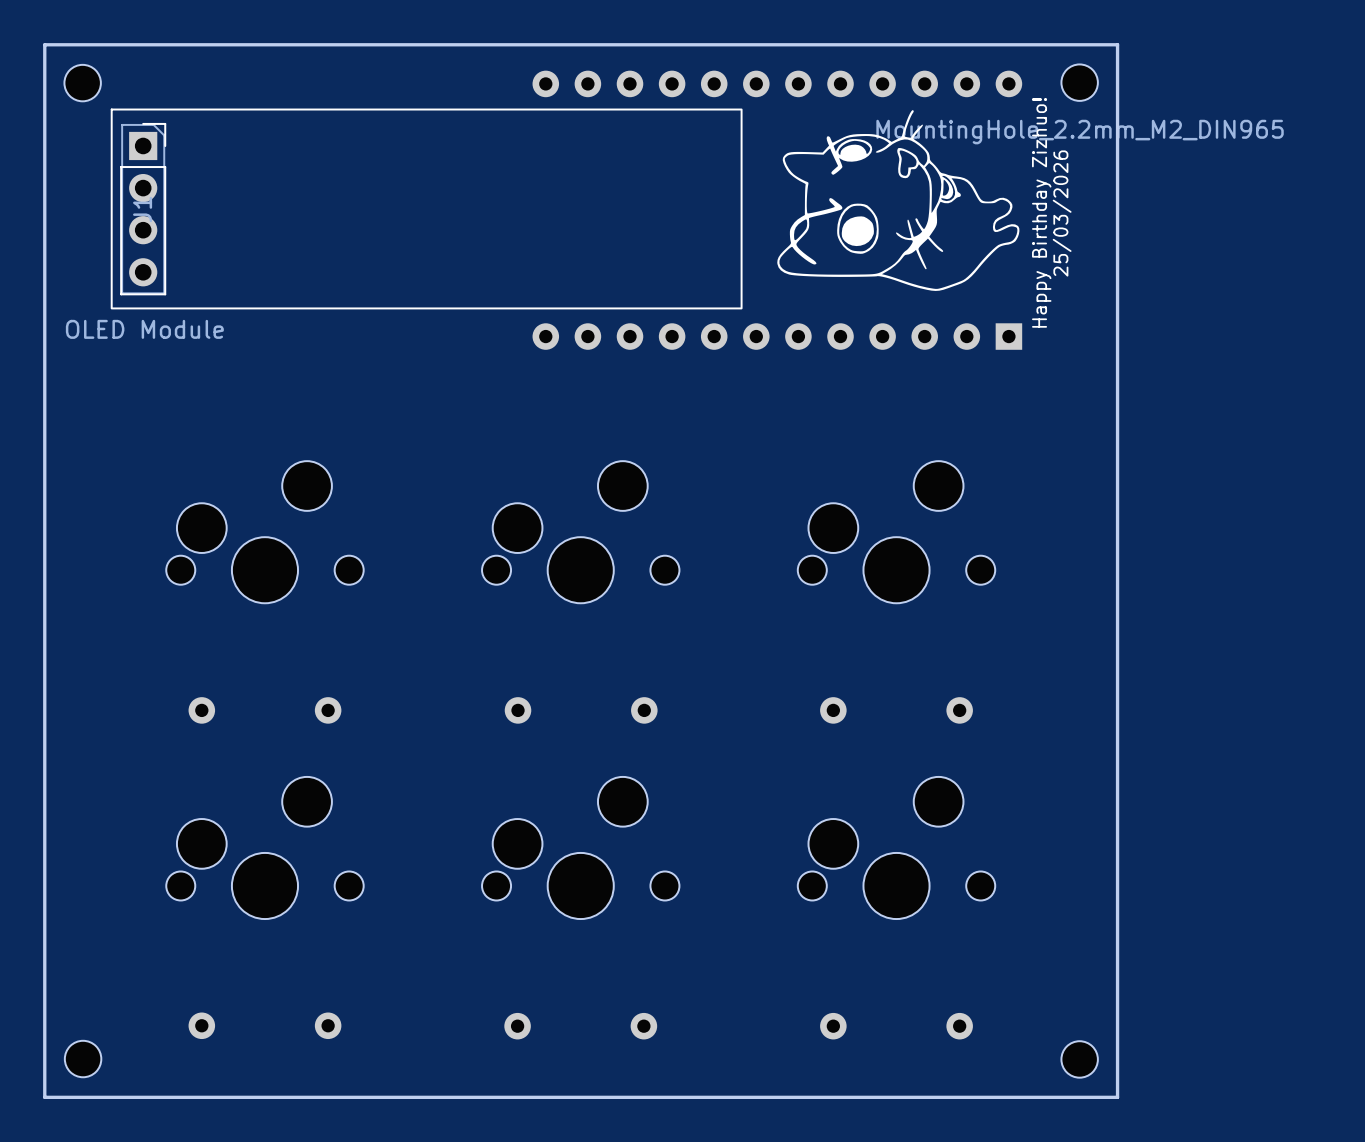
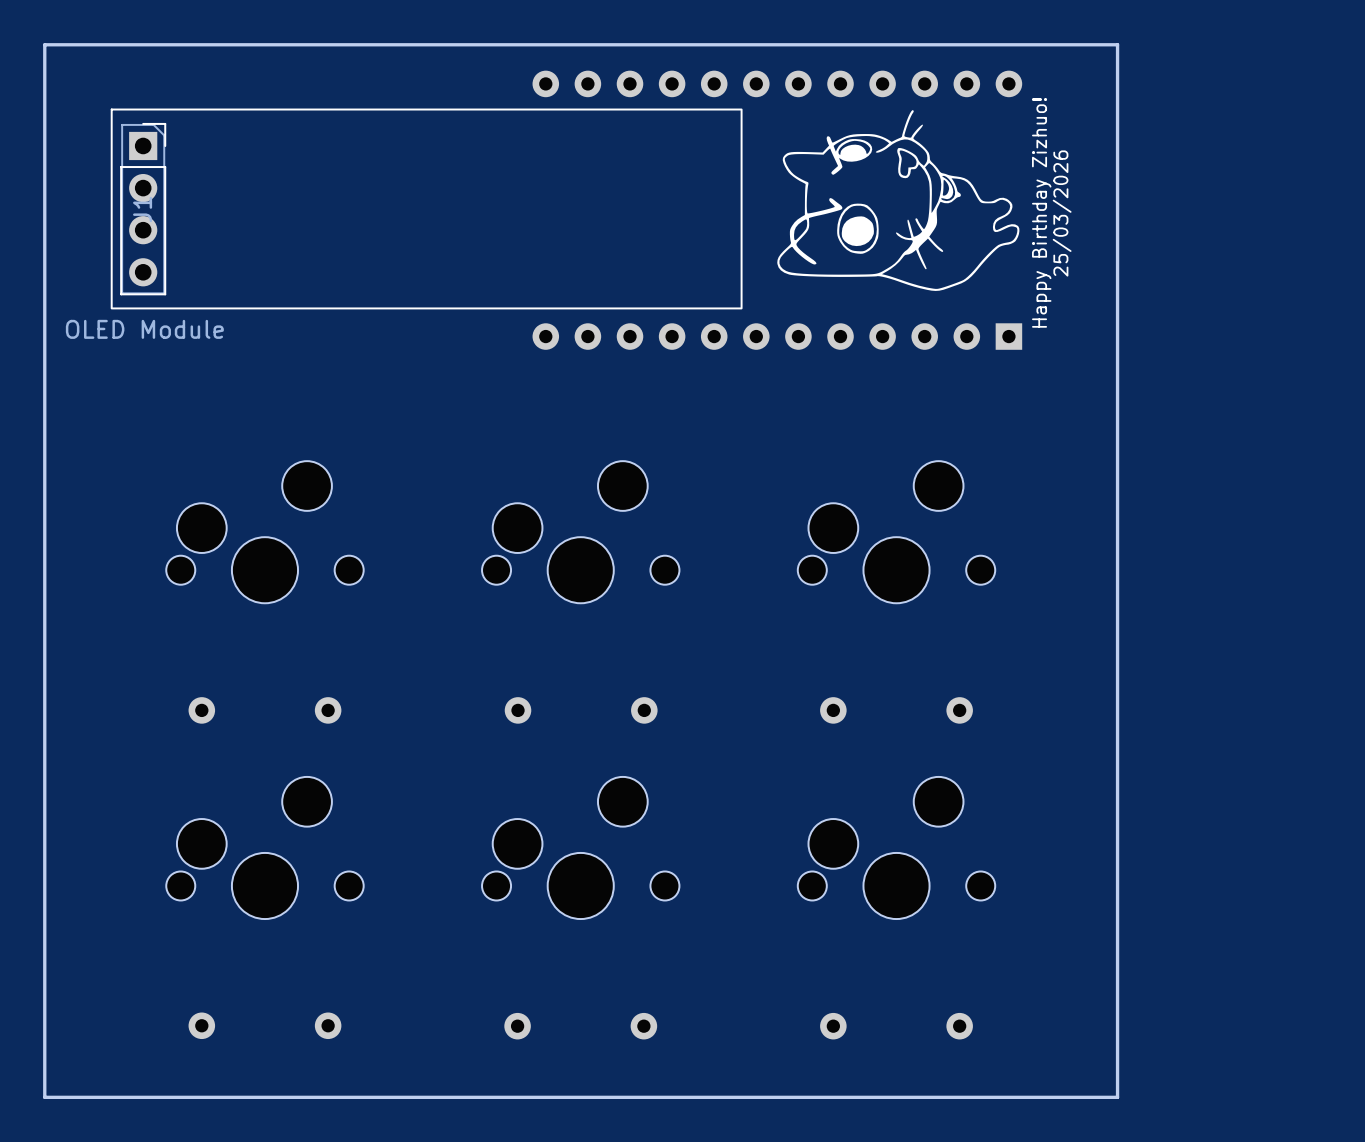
part: MountingHole_2.2mm_M2_DIN965 (1079, 82) -> none
part: (82, 83) -> none
part: (83, 1059) -> none
part: (1079, 1059) -> none

